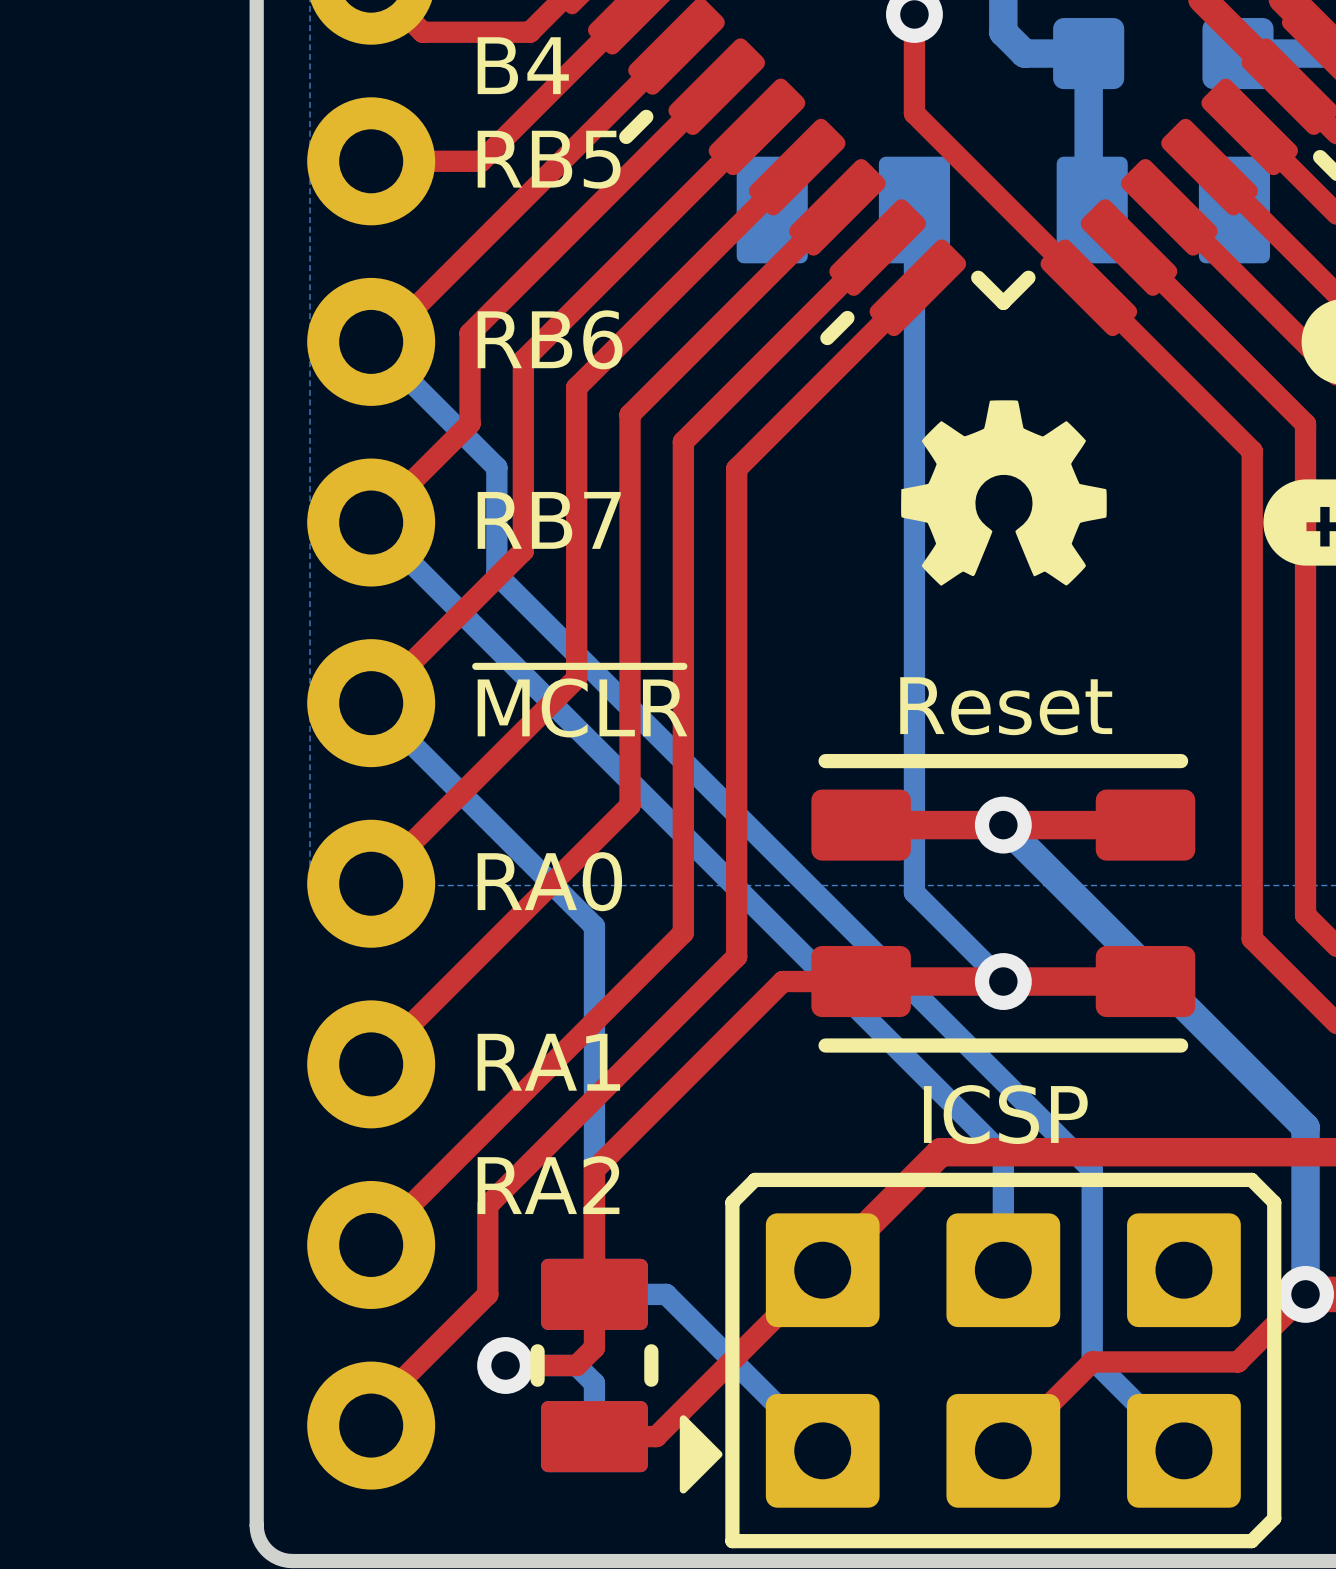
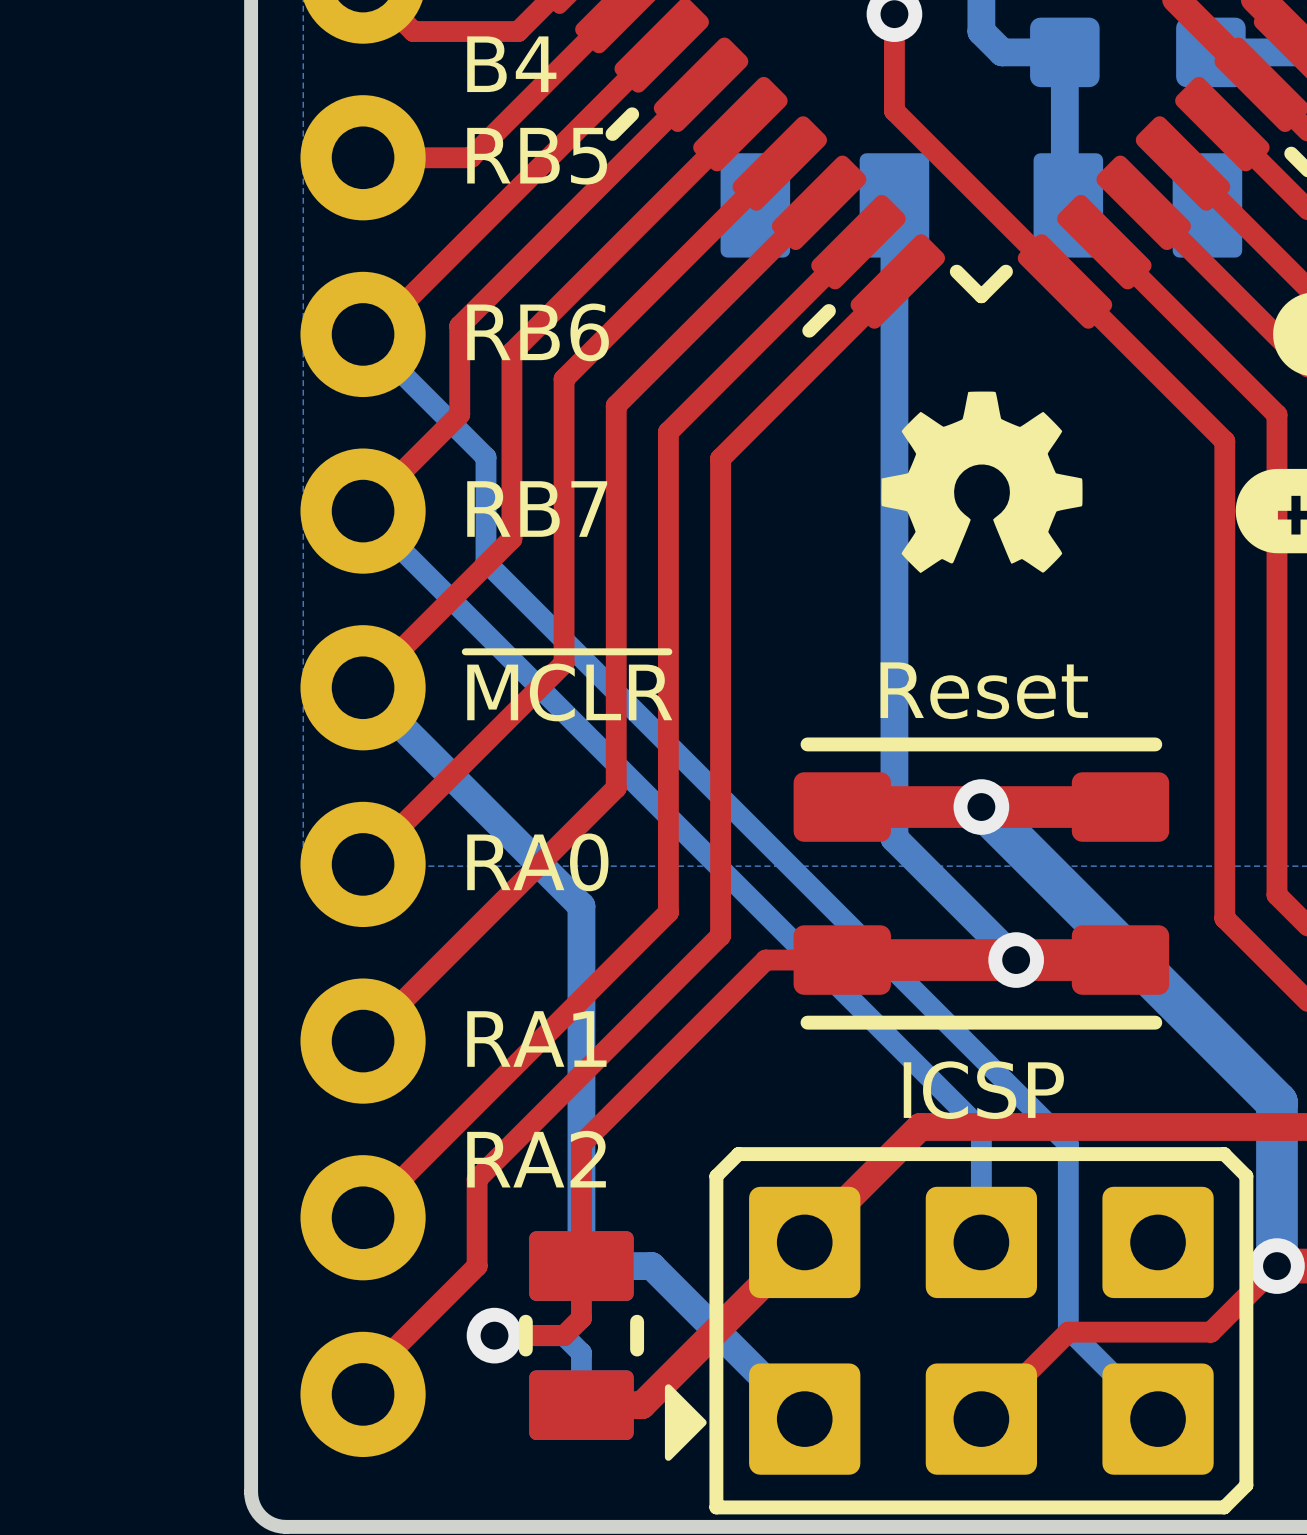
bottom track width: thin (914, 210) (914, 857) -> thick (894, 205) (894, 838)
bottom track width: thin (371, 703) (594, 926) (594, 1294) (666, 1294) (822, 1450) -> thick (363, 687) (581, 906) (581, 1266) (651, 1266) (804, 1419)
top track width: thin (854, 825) (1152, 825) -> thick (835, 807) (1127, 807)
bottom track width: thin (1003, 825) (1305, 1127) (1305, 1294) -> thick (981, 807) (1276, 1102) (1276, 1266)
bottom track: (914, 857) (914, 892) (1003, 981) -> (894, 838) (1016, 960)
top track width: thin (854, 981) (1152, 981) -> thick (835, 960) (1127, 960)
via position: (1003, 981) -> (1016, 960)
top track width: thin (822, 1270) (656, 1436) (594, 1436) -> thick (804, 1242) (641, 1405) (581, 1405)

